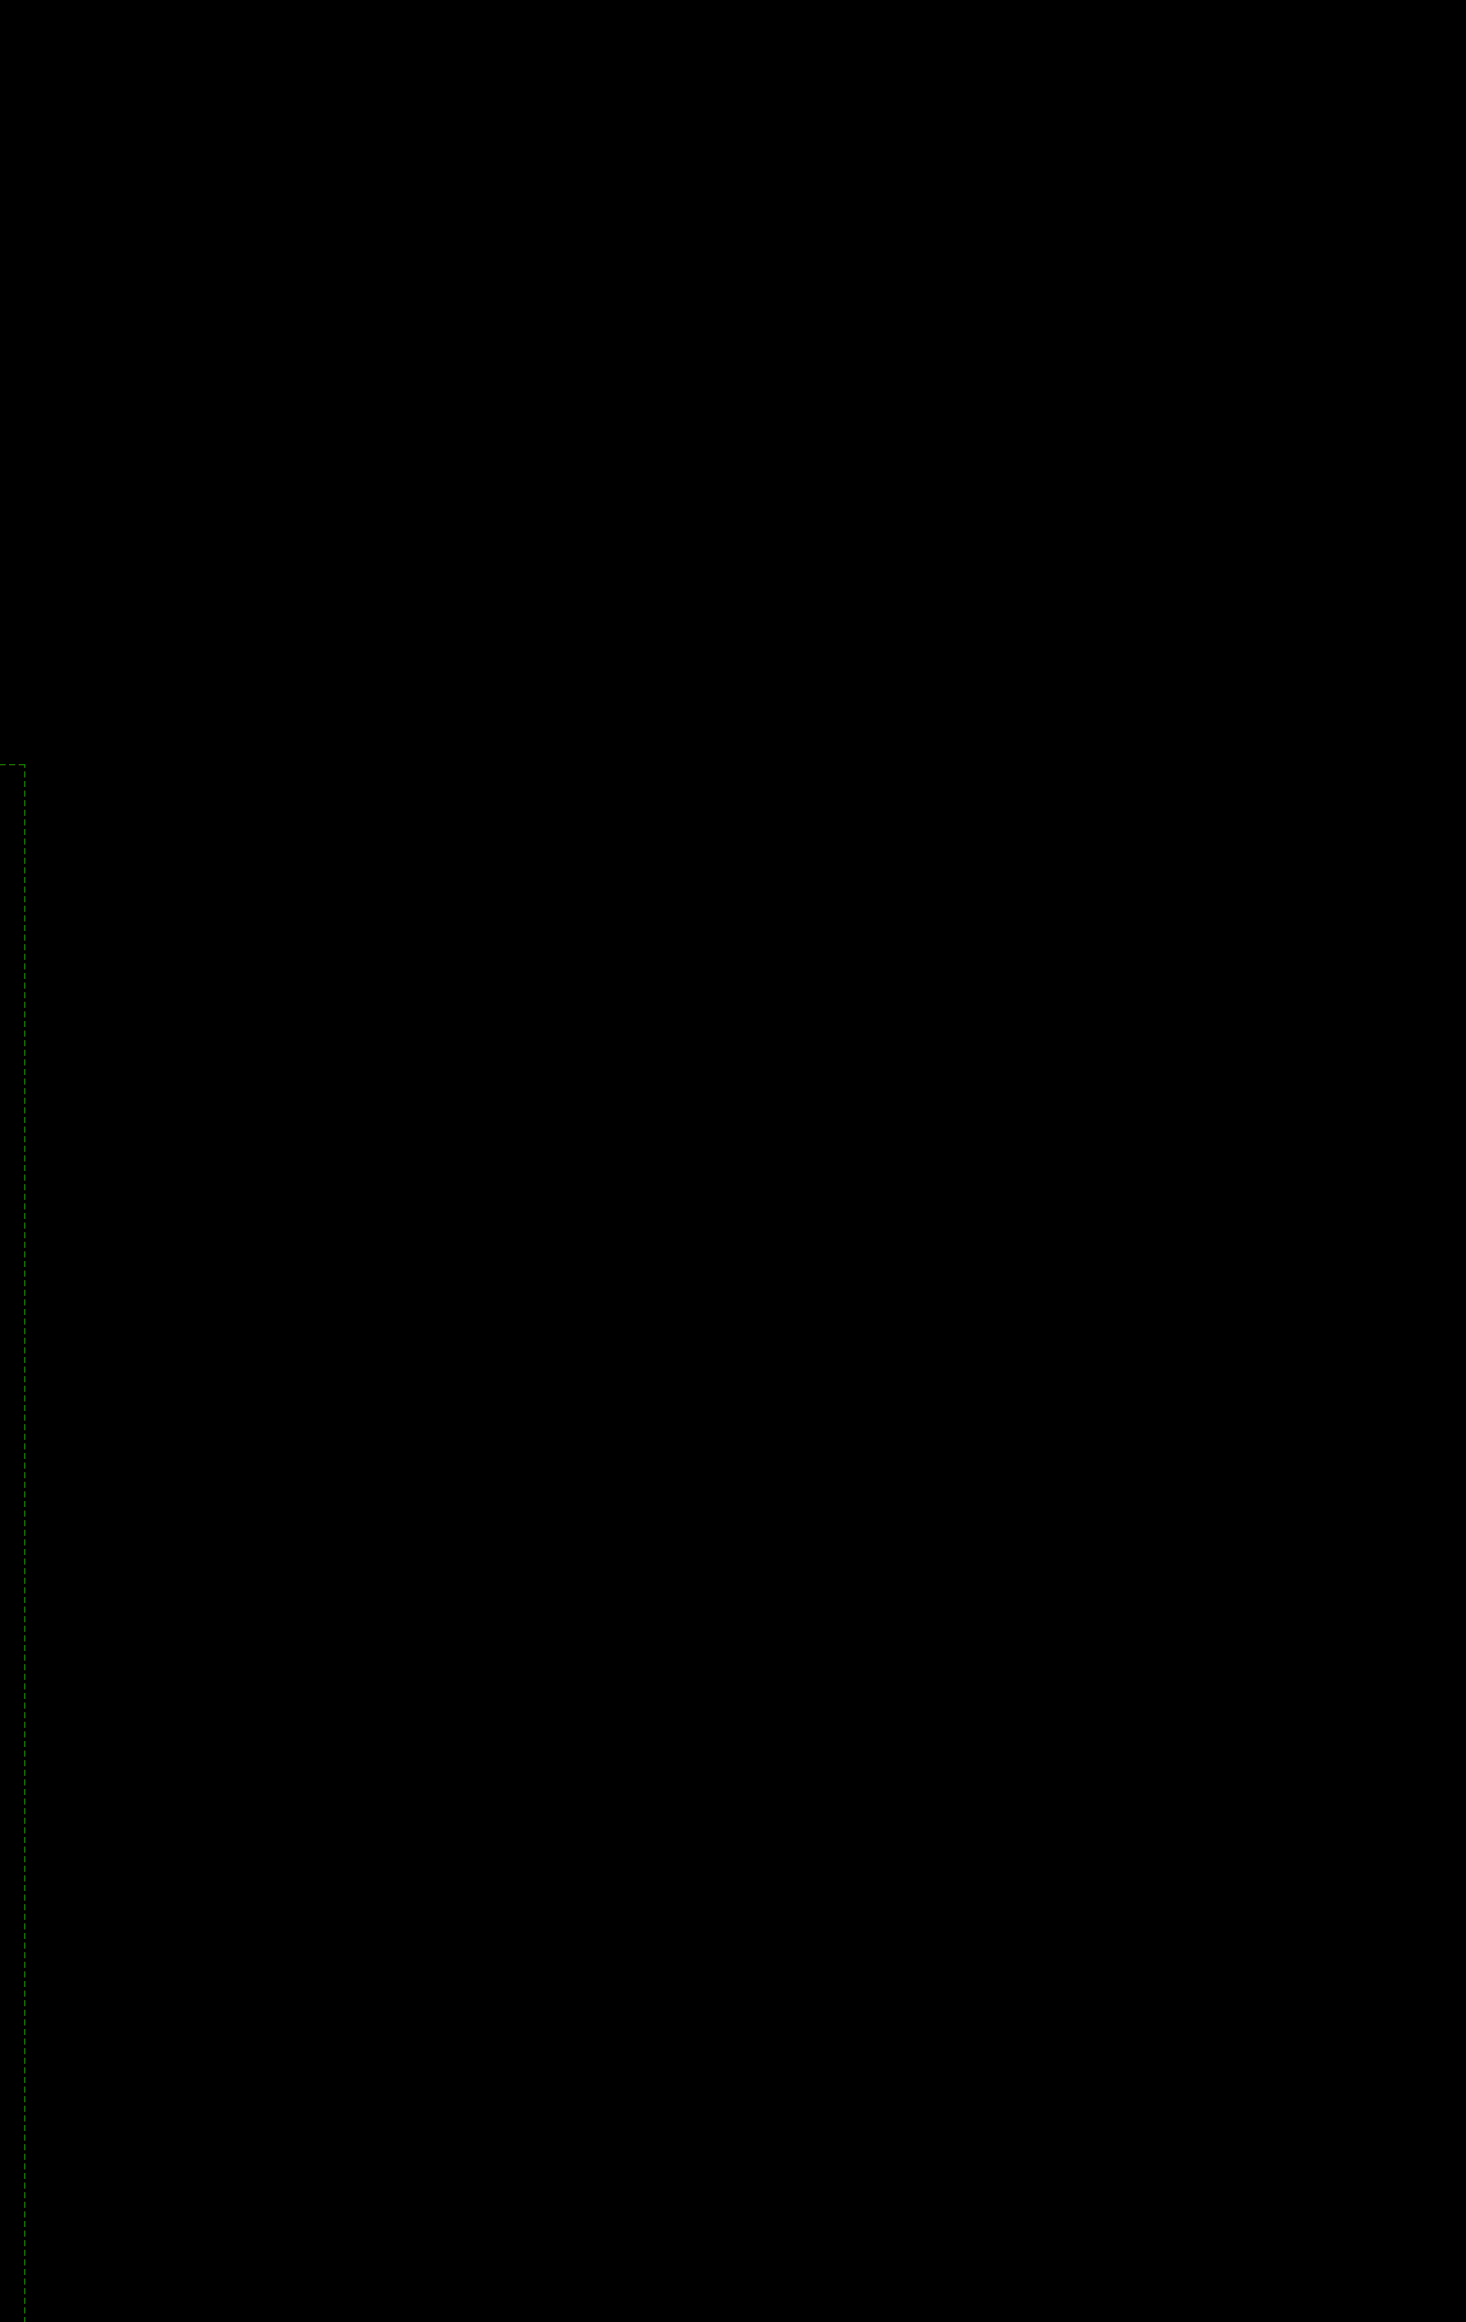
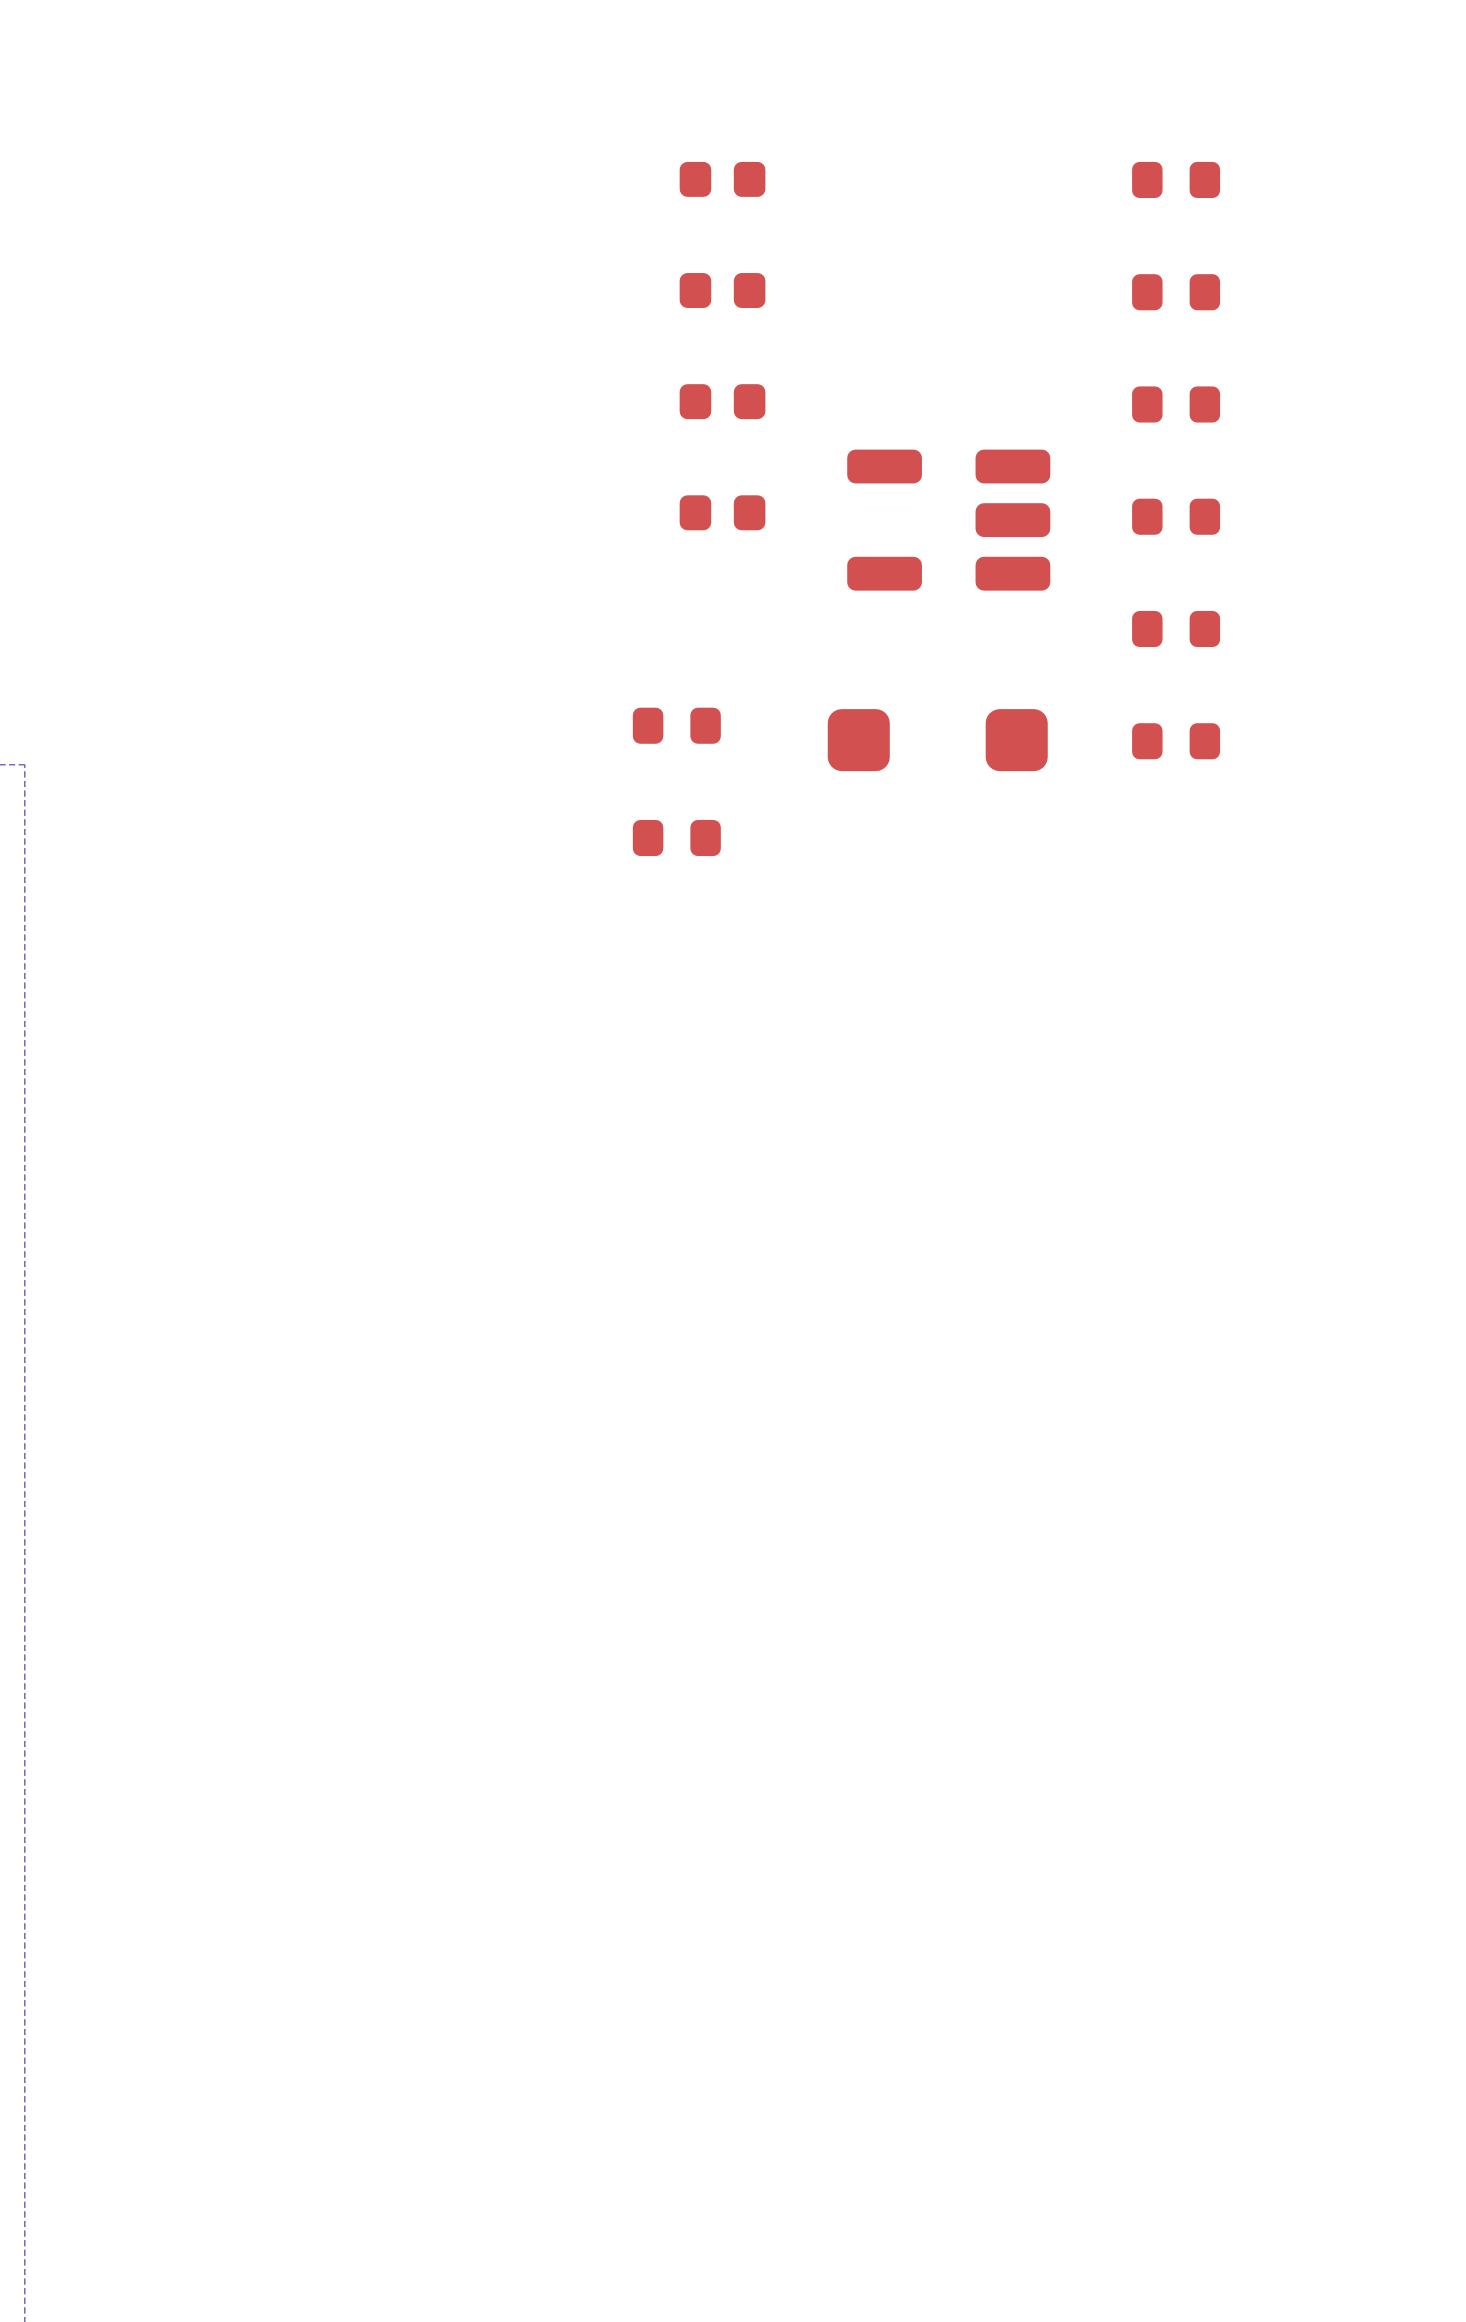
part: none -> (722, 179)
part: none -> (1176, 179)
part: none -> (722, 290)
part: none -> (1176, 292)
part: none -> (722, 401)
part: none -> (1176, 404)
part: none -> (722, 512)
part: none -> (1176, 516)
part: none -> (948, 520)
part: none -> (1176, 628)
part: none -> (676, 725)
part: none -> (937, 740)
part: none -> (1176, 741)
part: none -> (676, 837)

